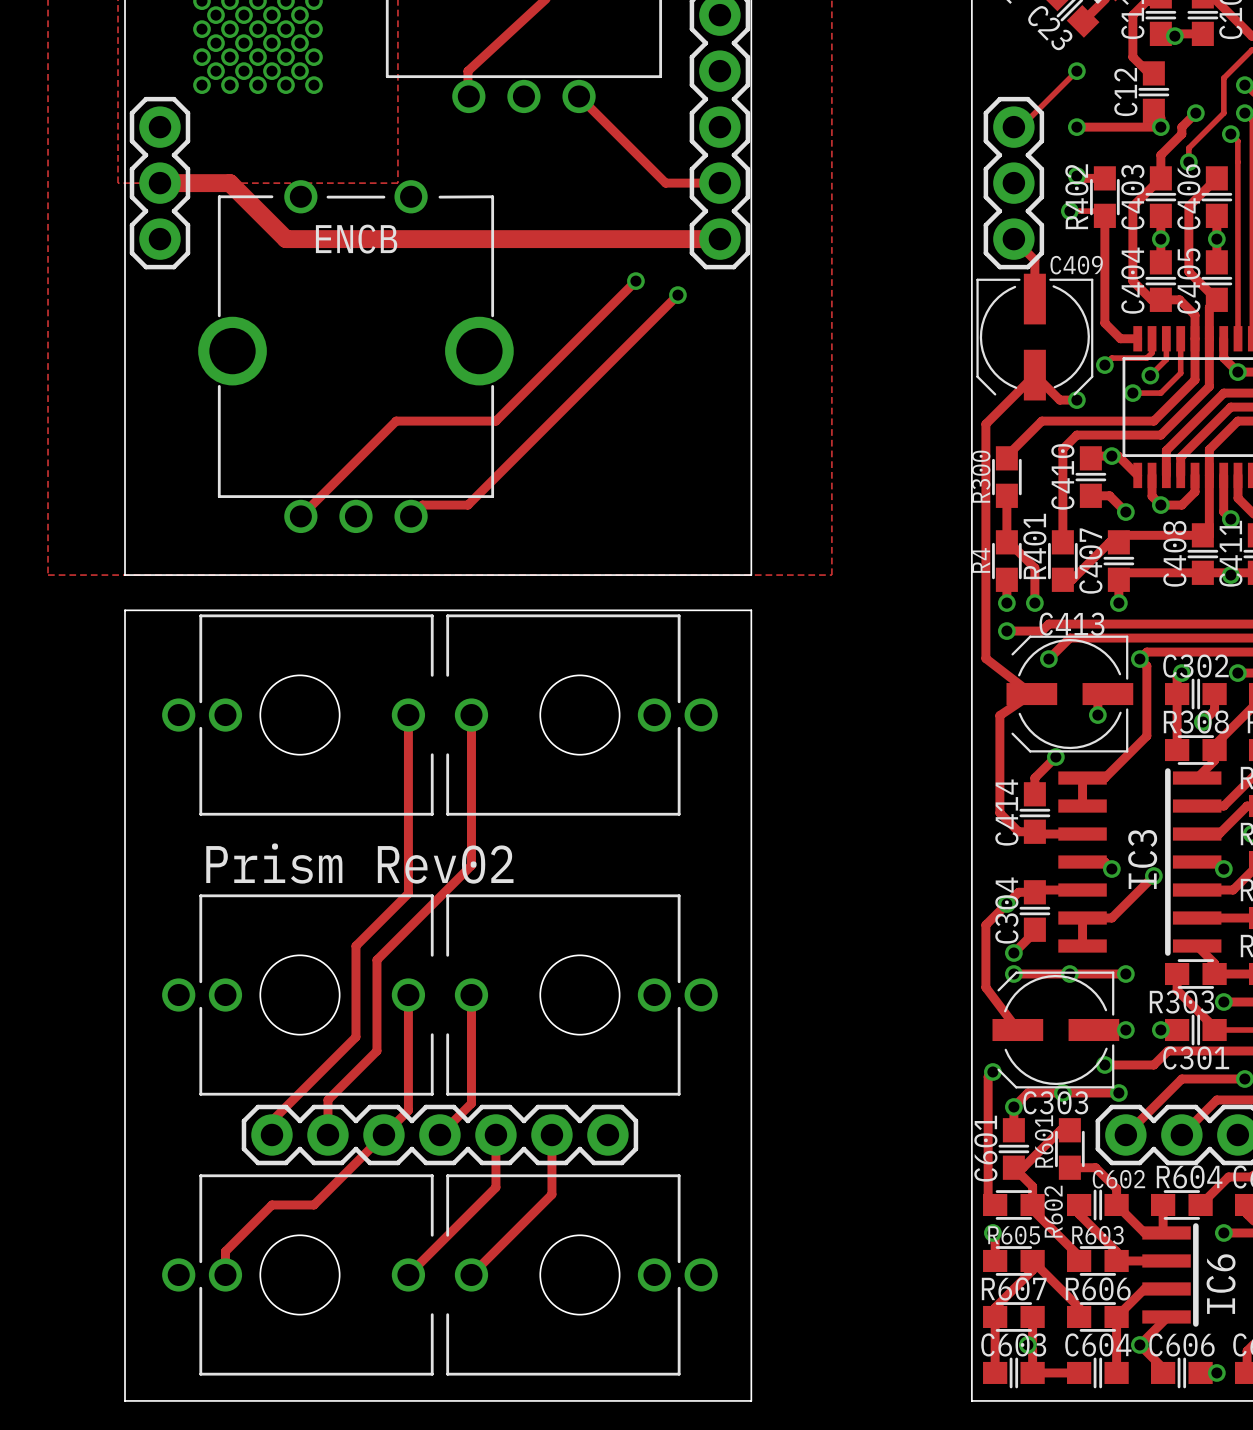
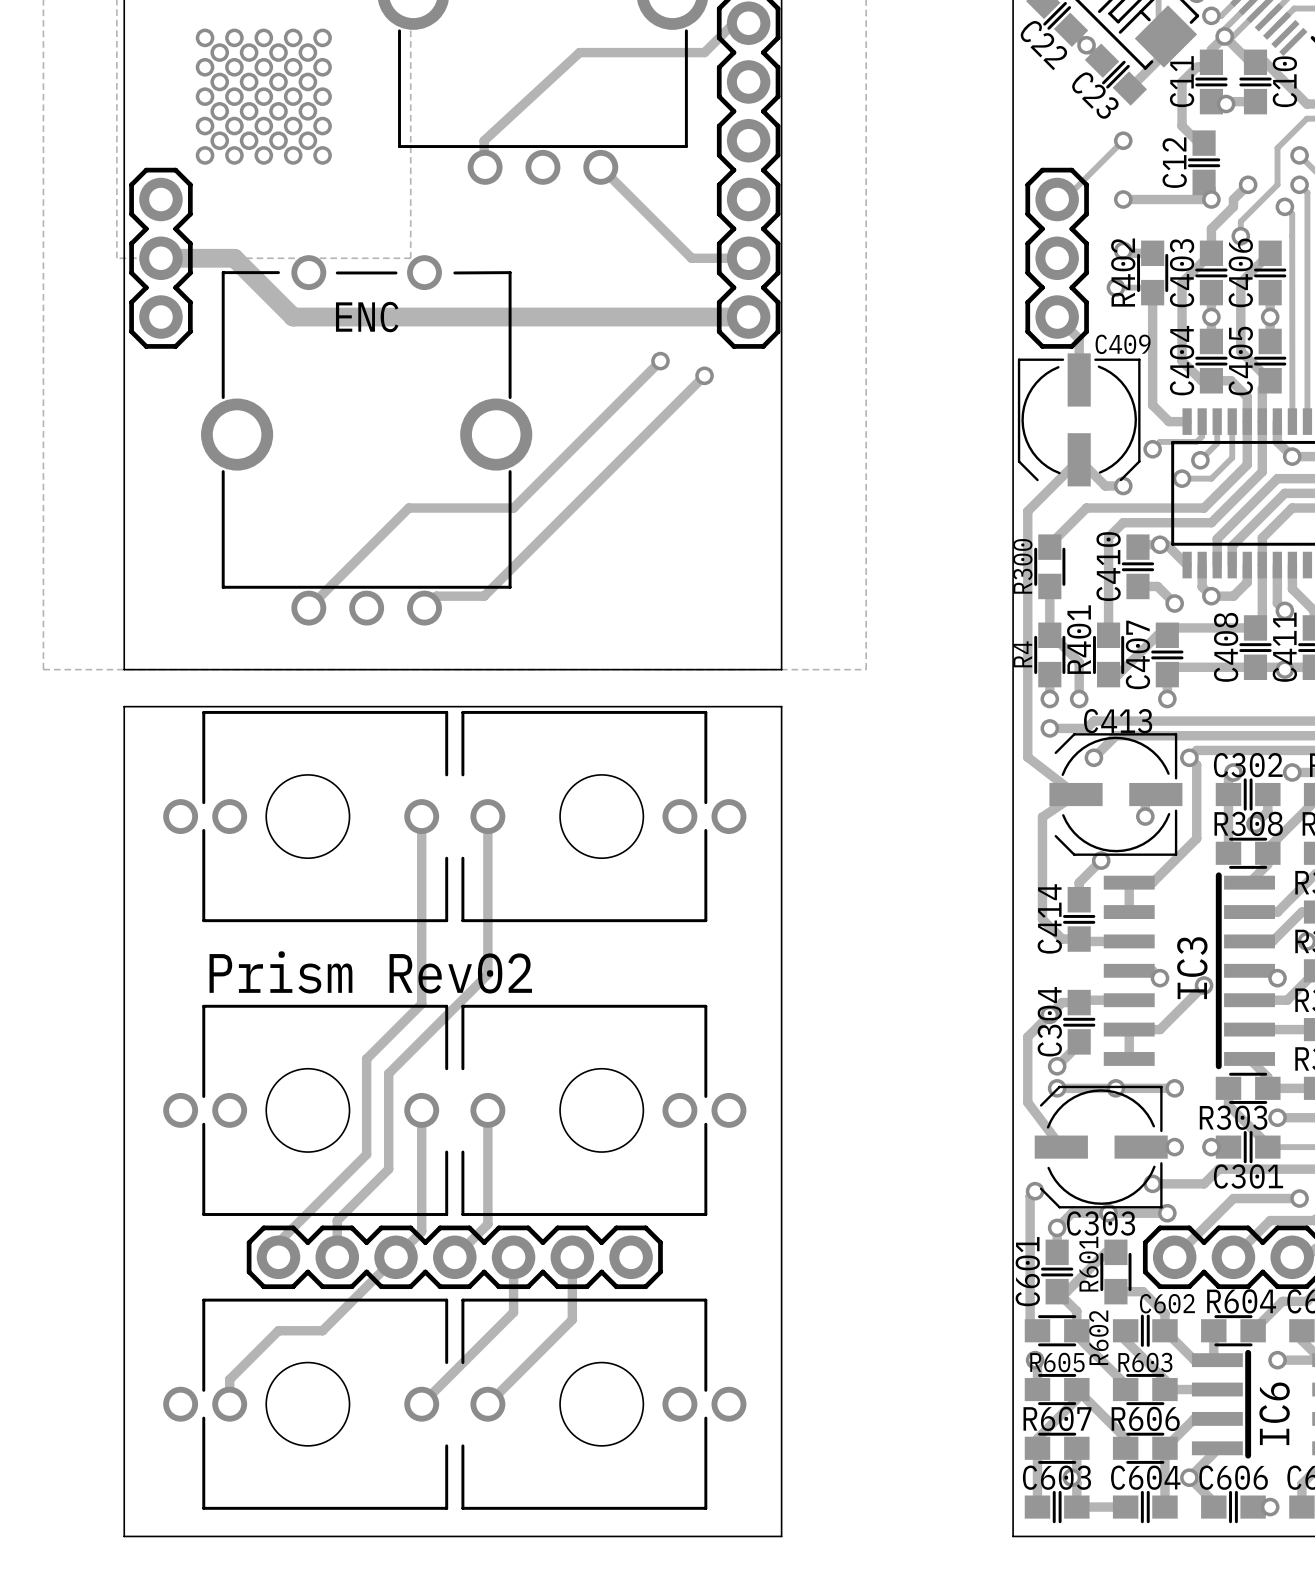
ENCB name: ENCB (356, 239) -> ENC (367, 317)

